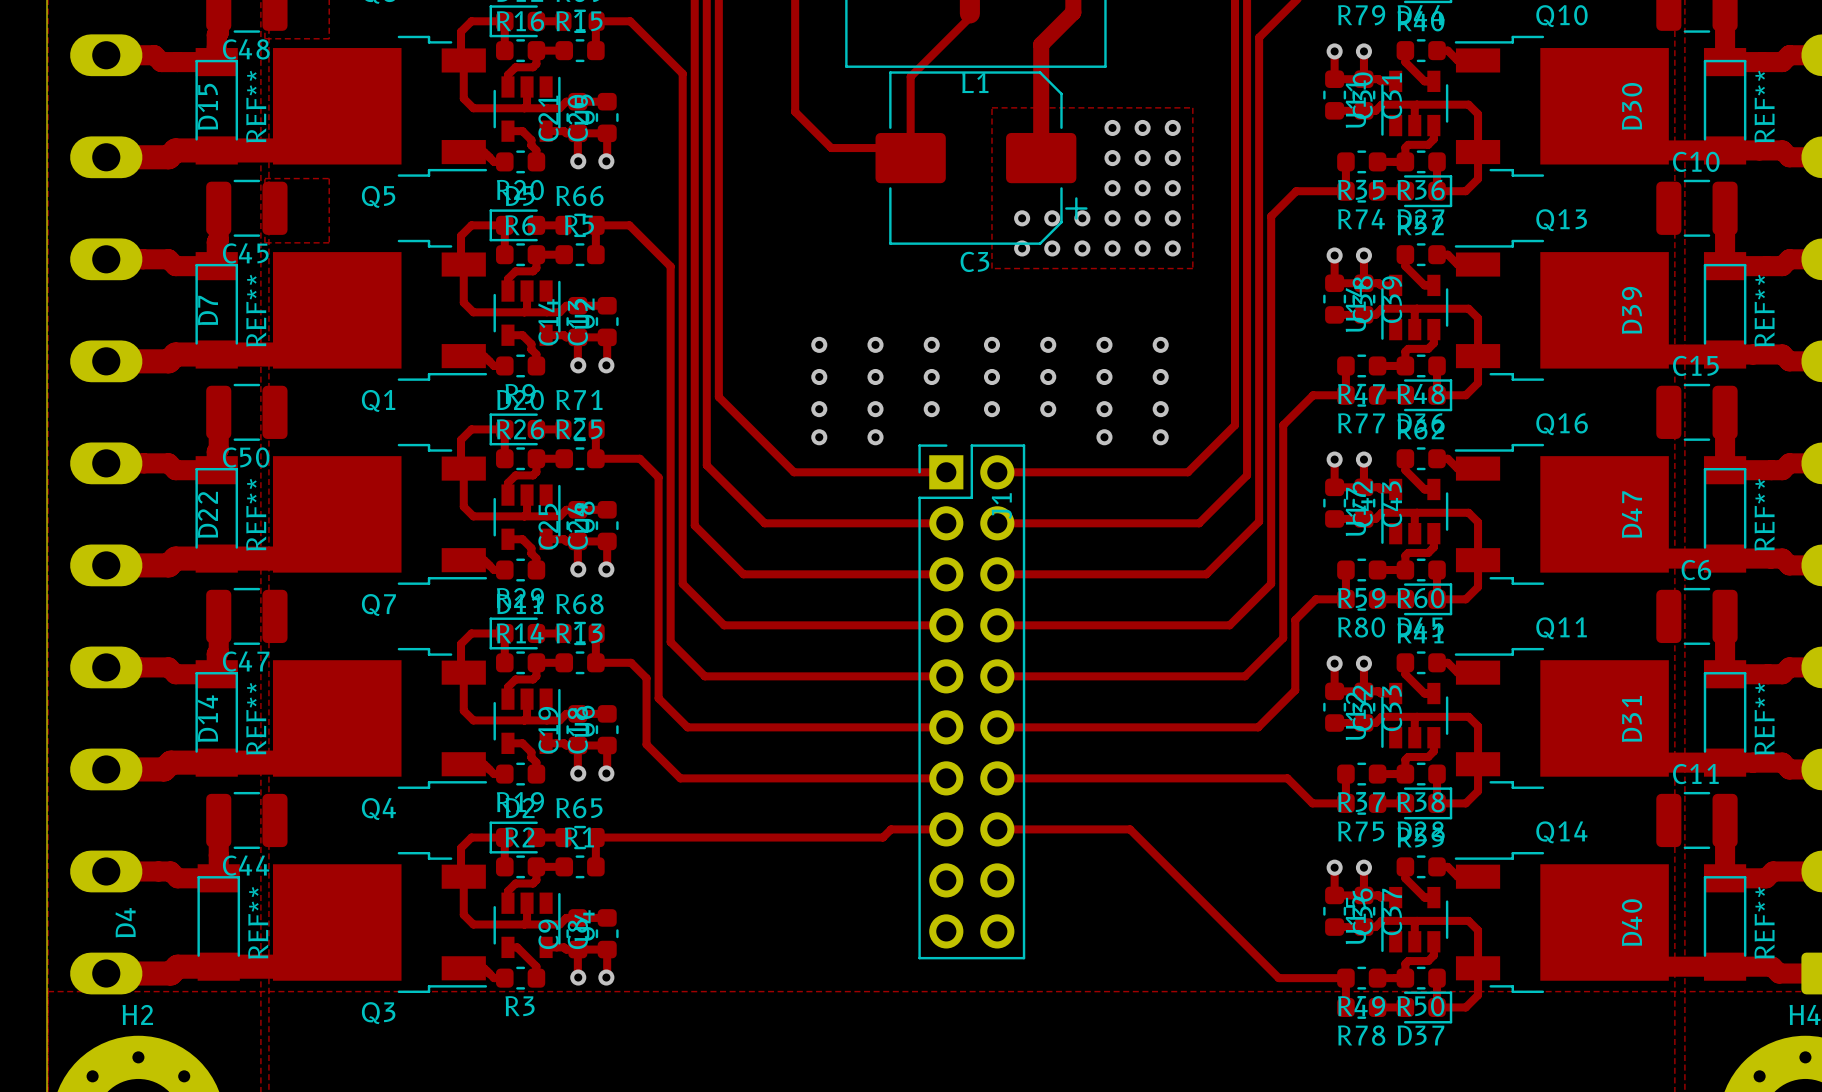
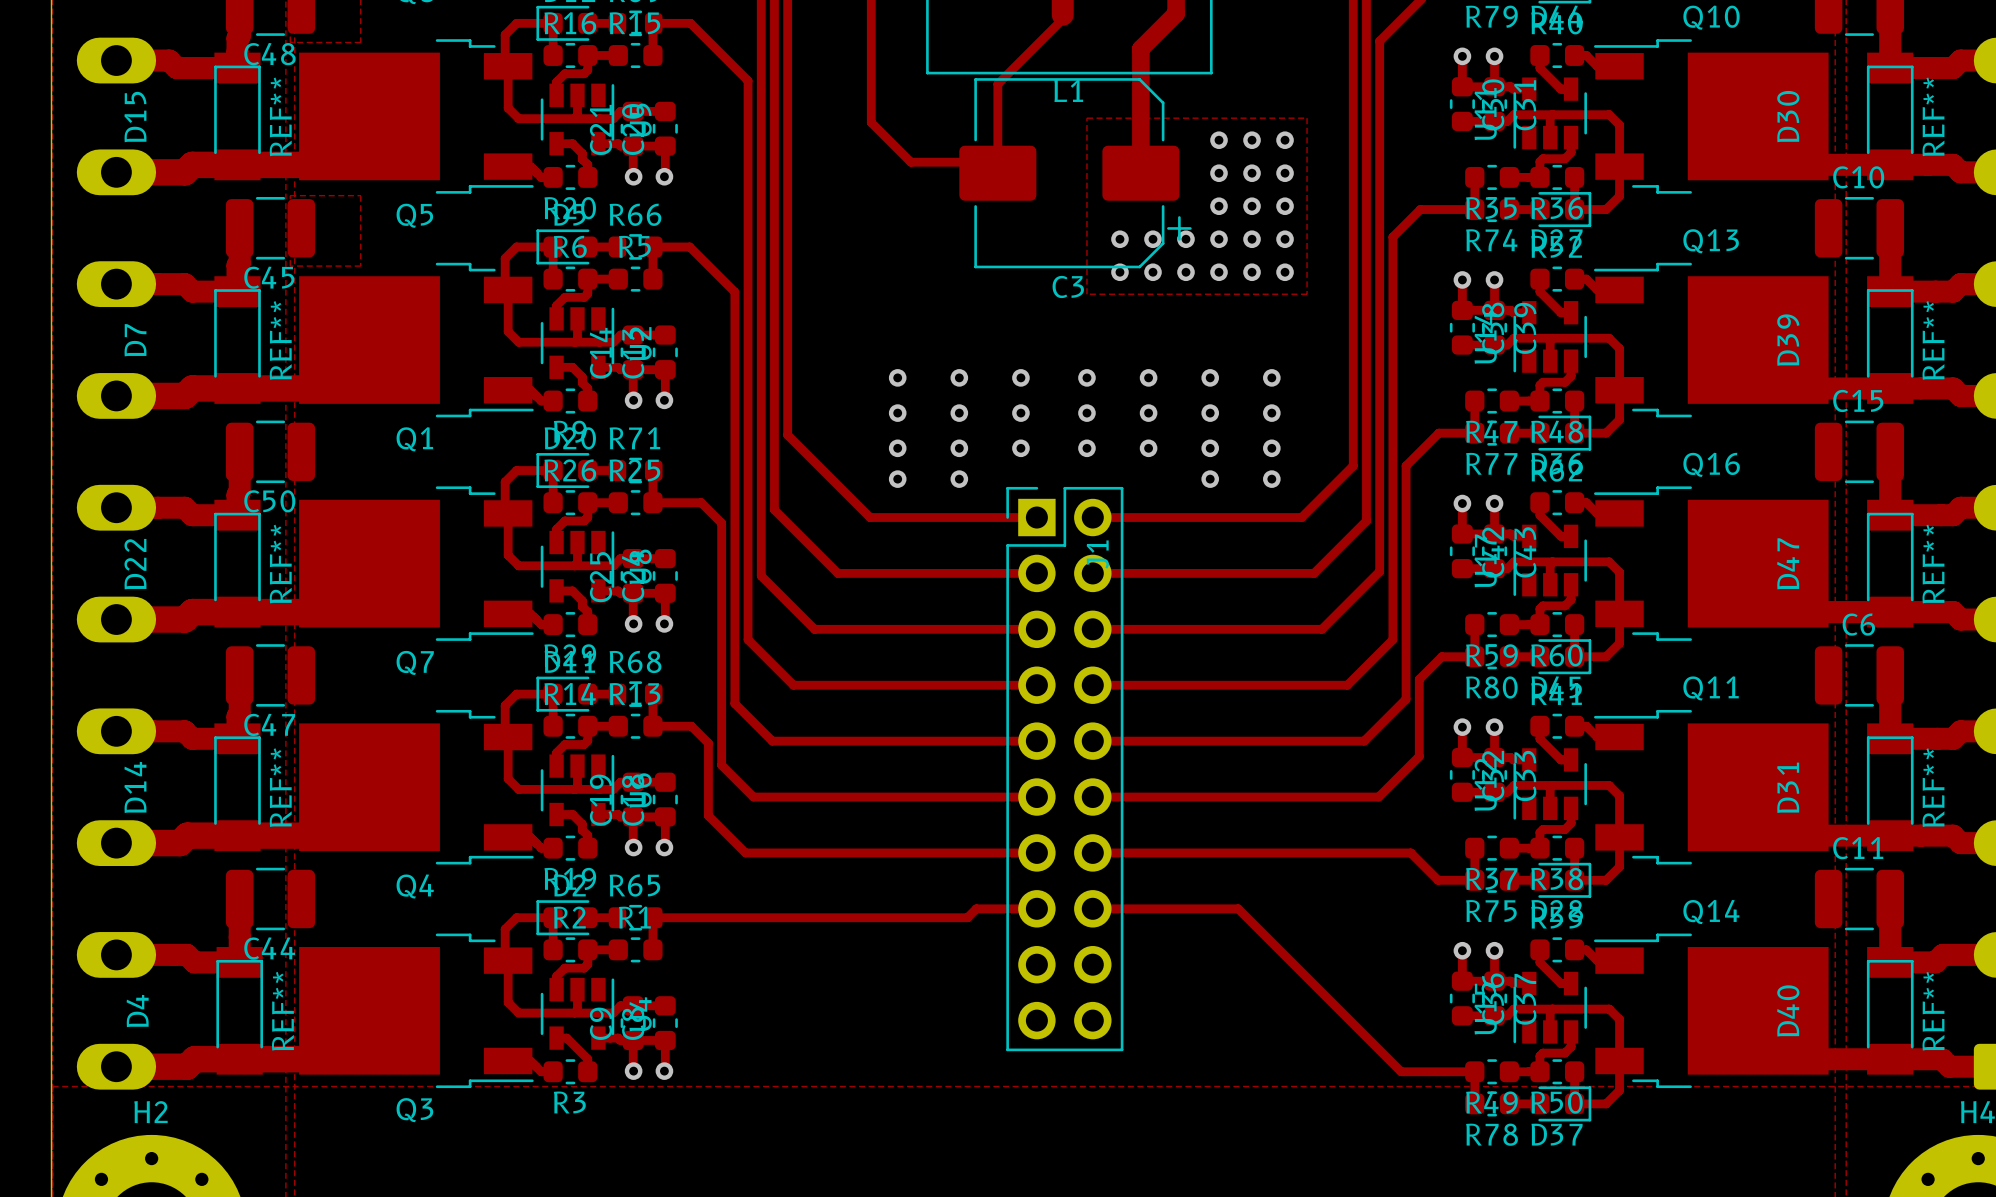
D15 name position: D15 (207, 106) -> D15 (135, 117)
D7 name position: D7 (208, 310) -> D7 (135, 340)
D22 name position: D22 (207, 514) -> D22 (135, 564)
D14 name position: D14 (207, 718) -> D14 (135, 787)

